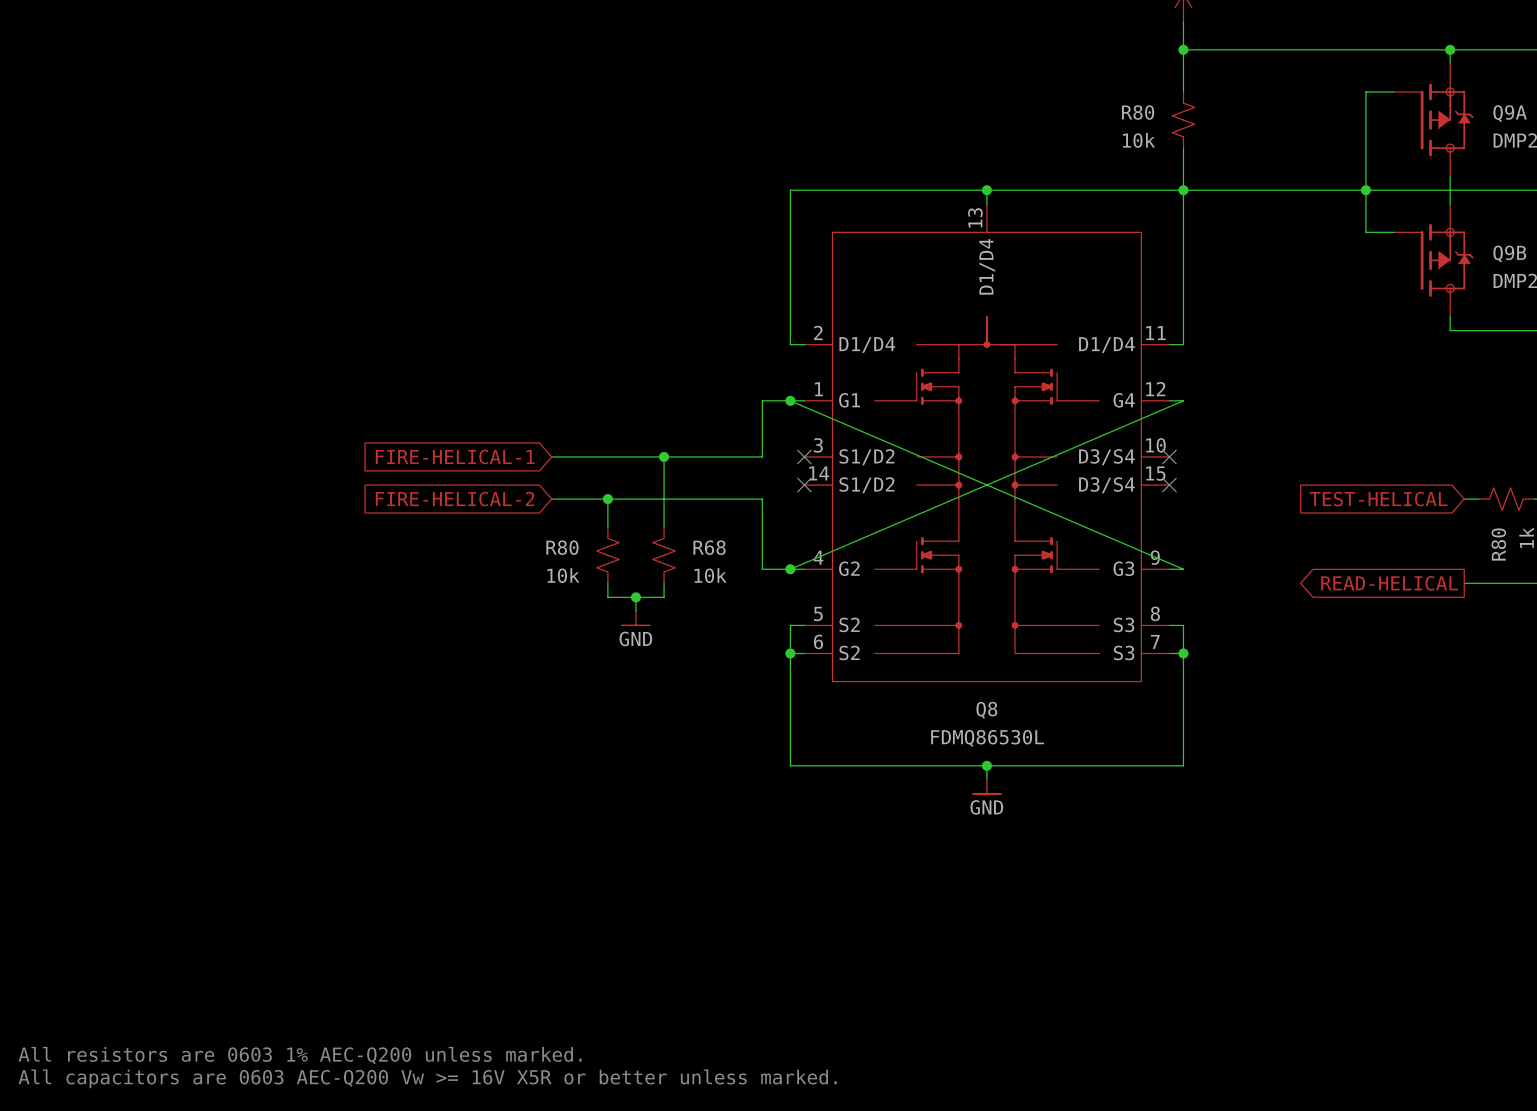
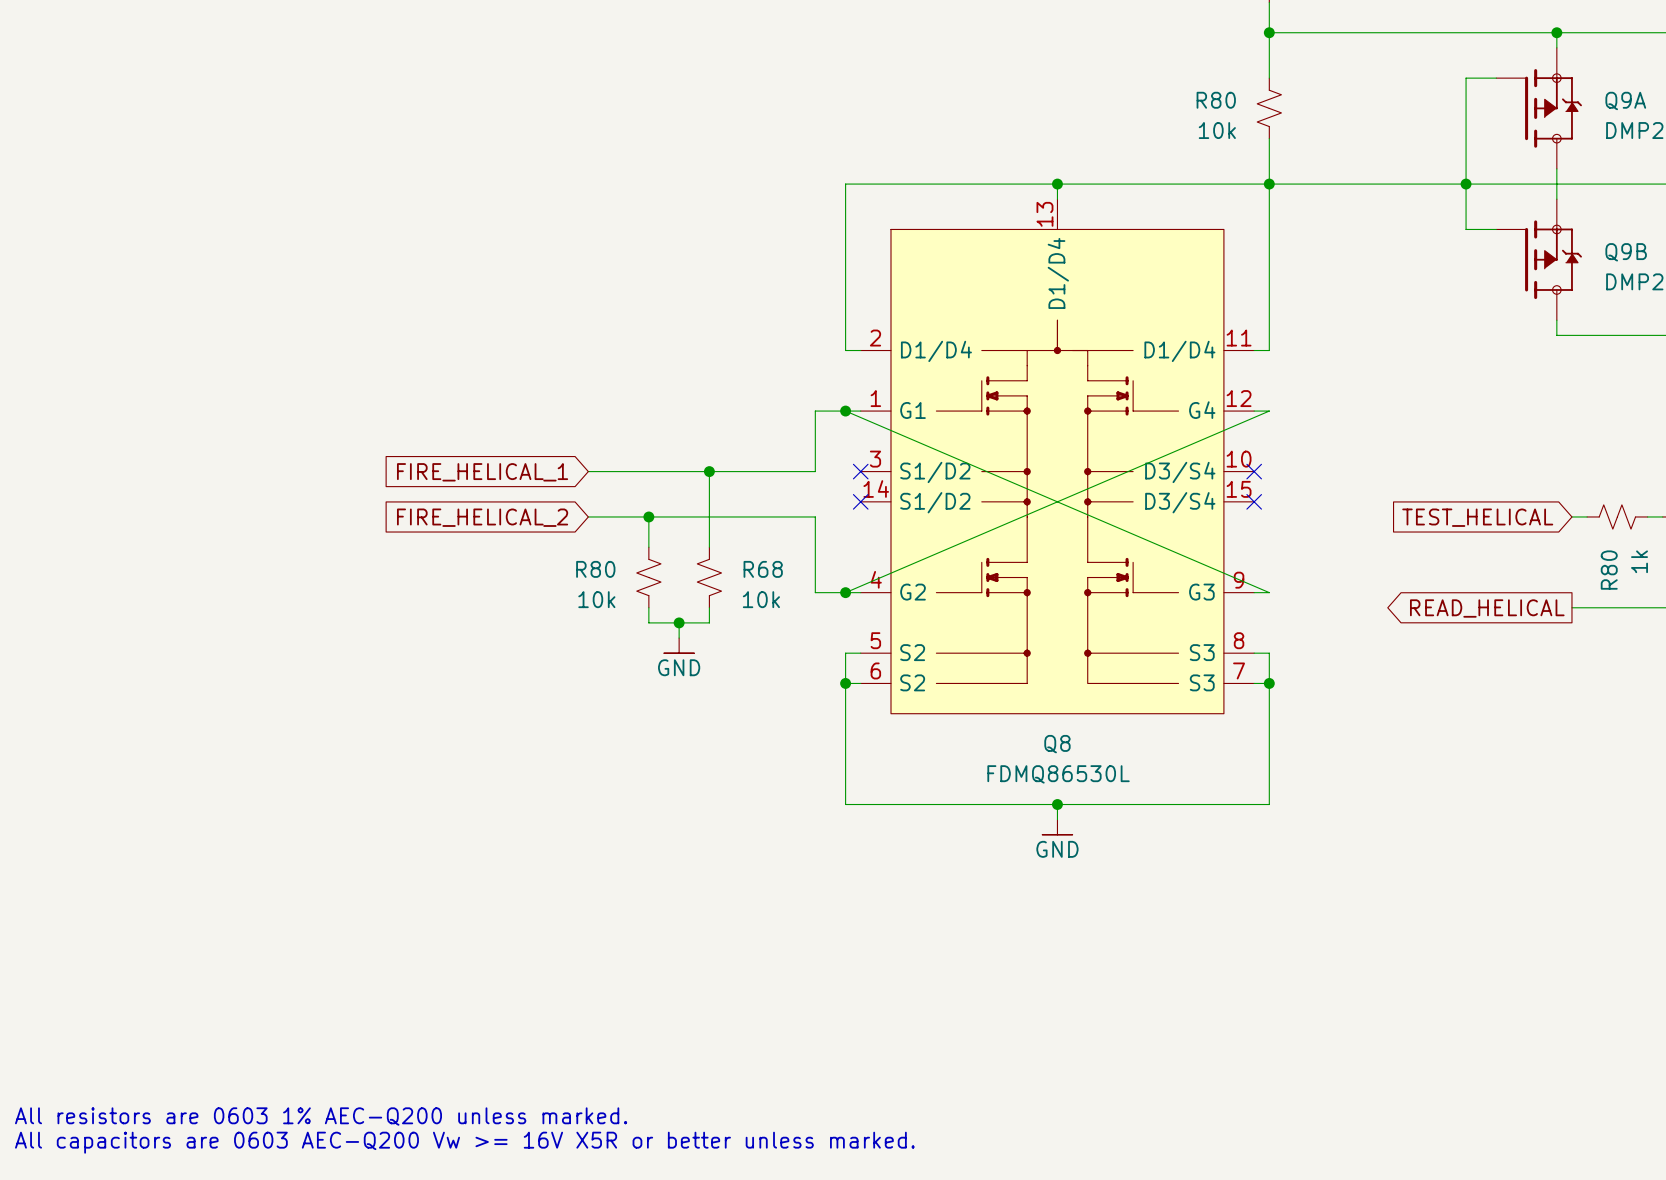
global label: FIRE-HELICAL-1 (455, 456) -> FIRE_HELICAL_1 (482, 472)
global label: FIRE-HELICAL-2 (455, 499) -> FIRE_HELICAL_2 (482, 517)
global label: TEST-HELICAL (1378, 499) -> TEST_HELICAL (1477, 517)
global label: READ-HELICAL (1389, 583) -> READ_HELICAL (1487, 608)

